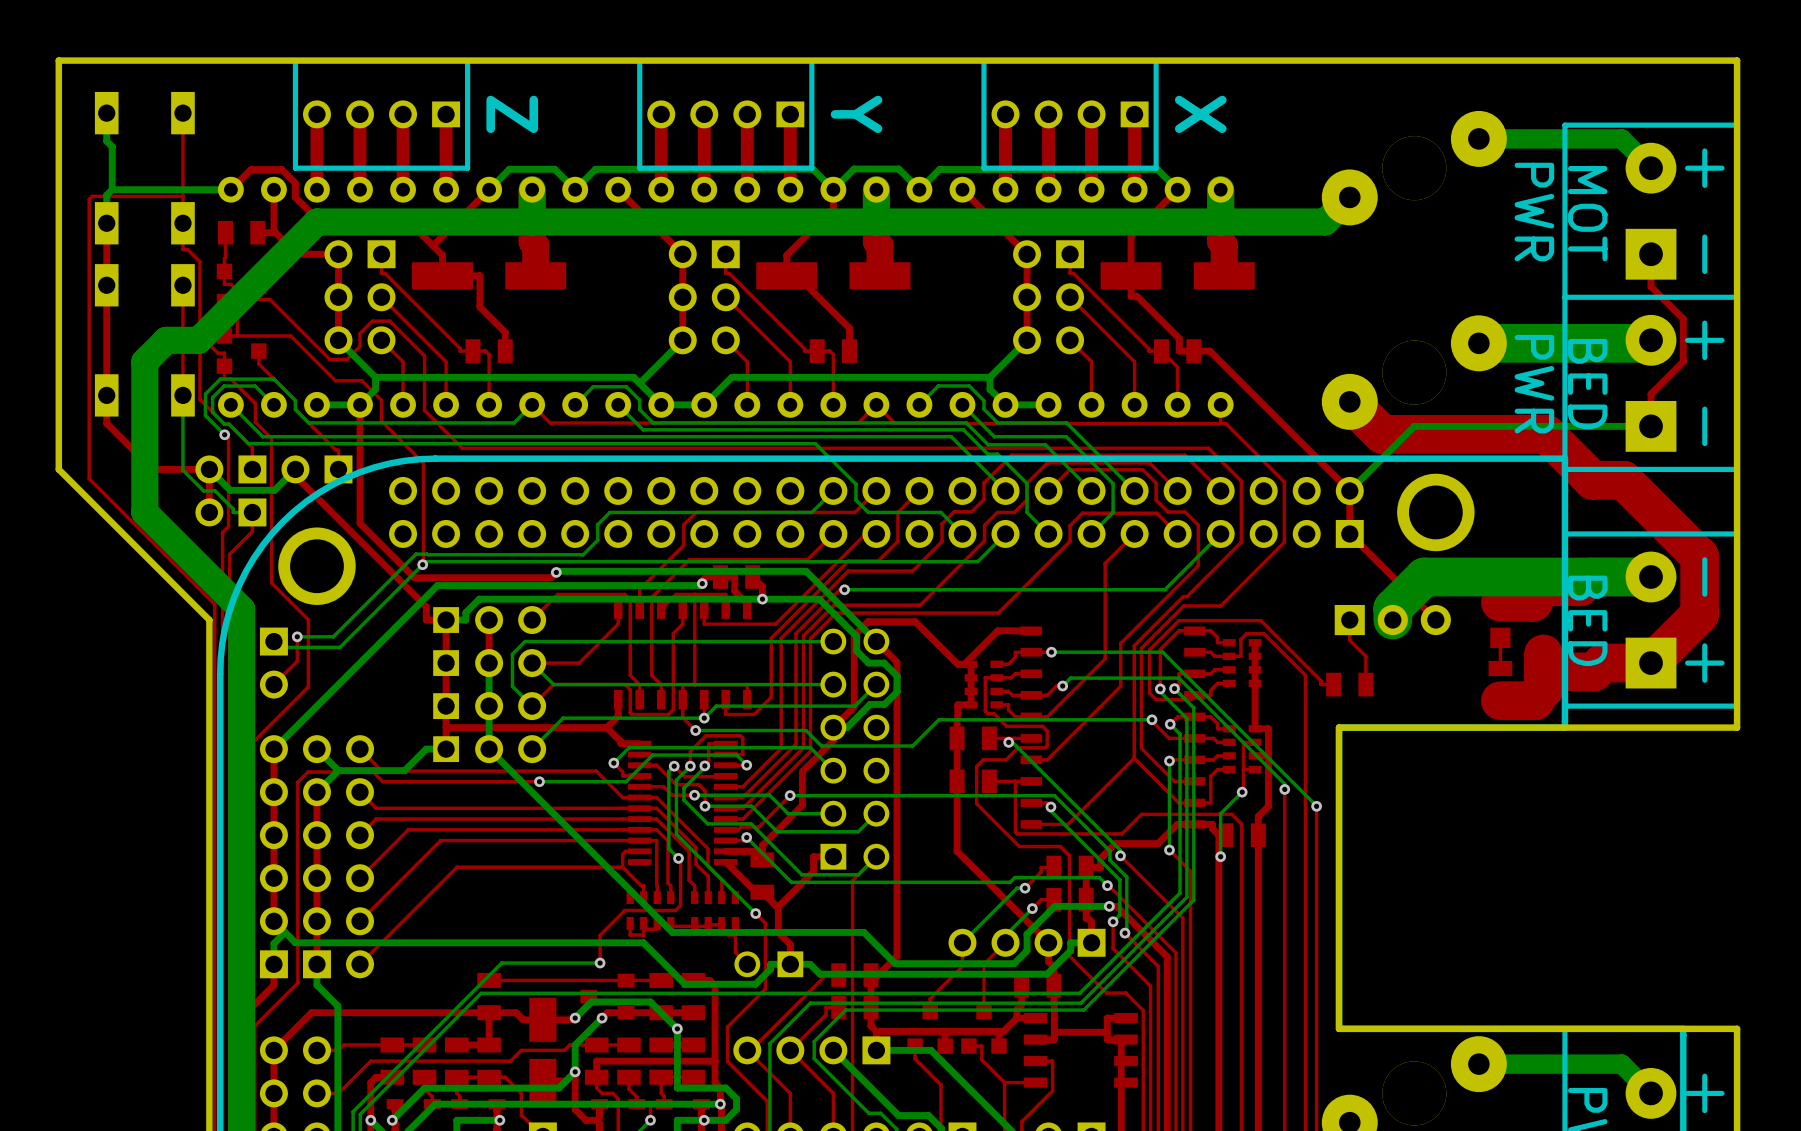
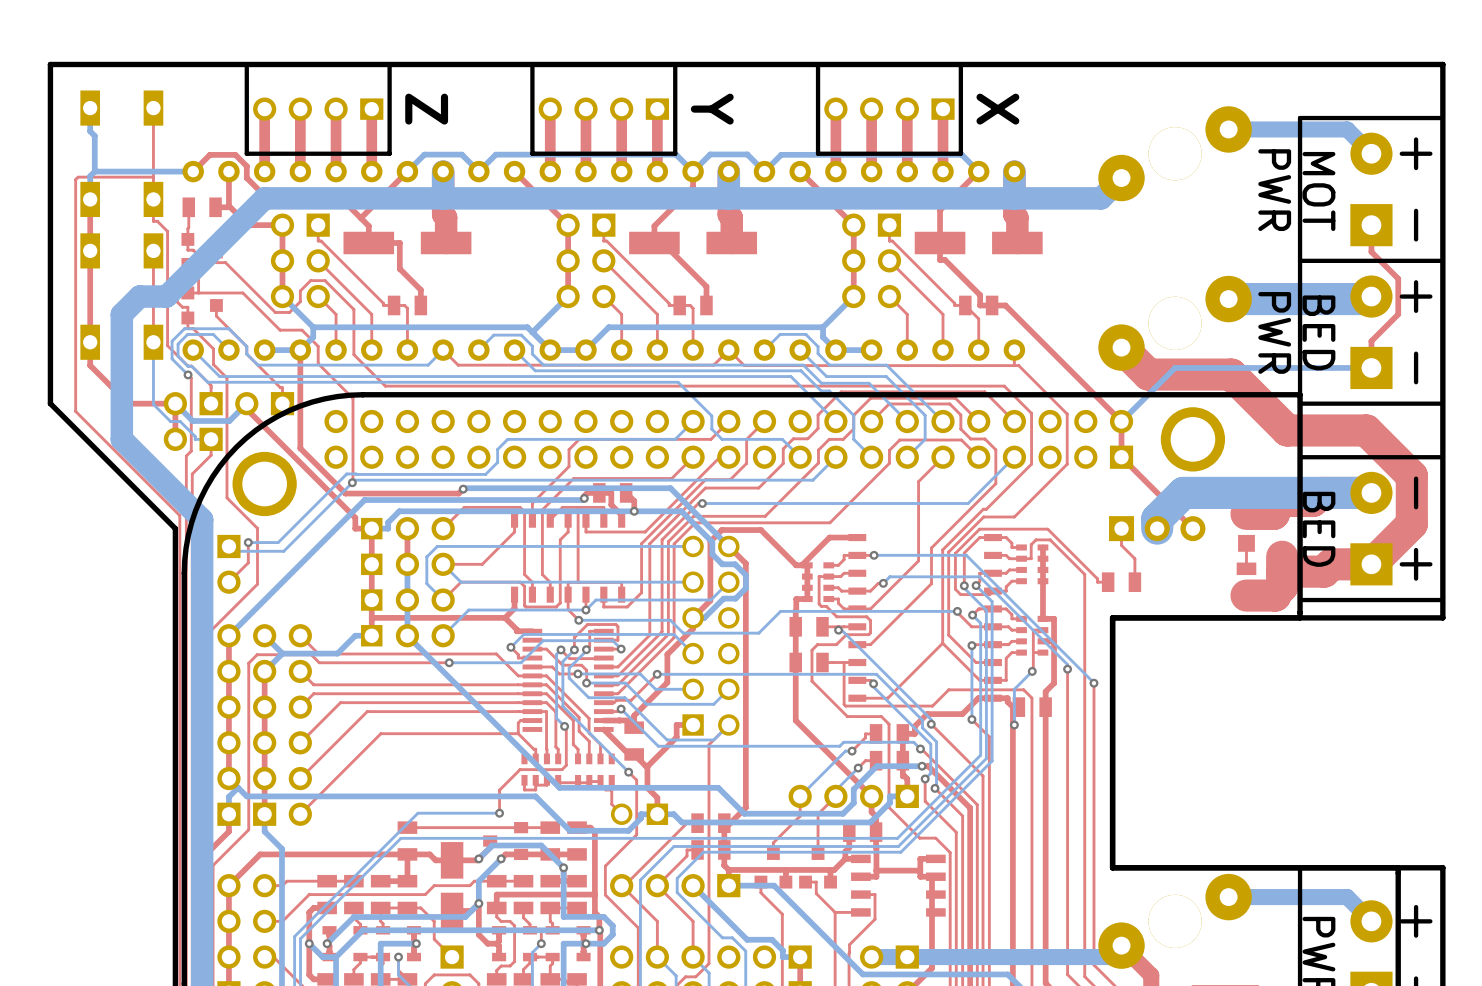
top track: (1482, 434) (1546, 434) (1592, 480) (1623, 480) (1644, 501) -> (1231, 374) (1287, 430) (1366, 430)

